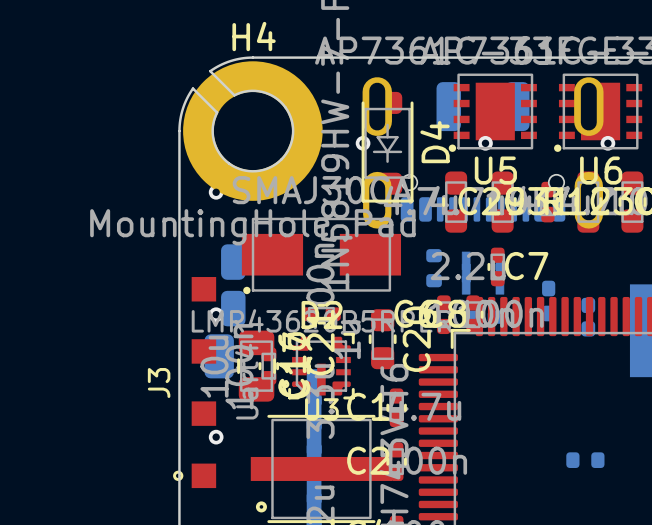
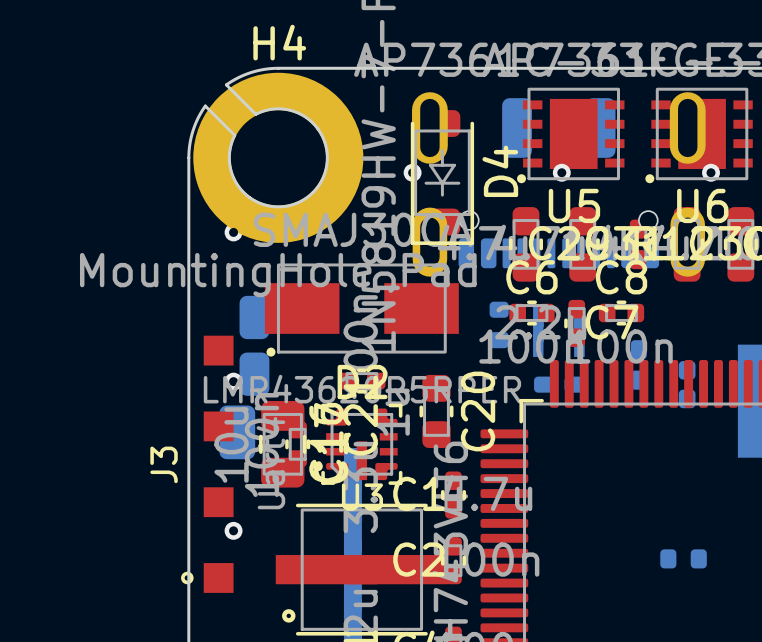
C6 footprint: [433, 295, 455, 335] -> [509, 300, 555, 326]
C8 footprint: [462, 295, 484, 335] -> [598, 300, 645, 326]

